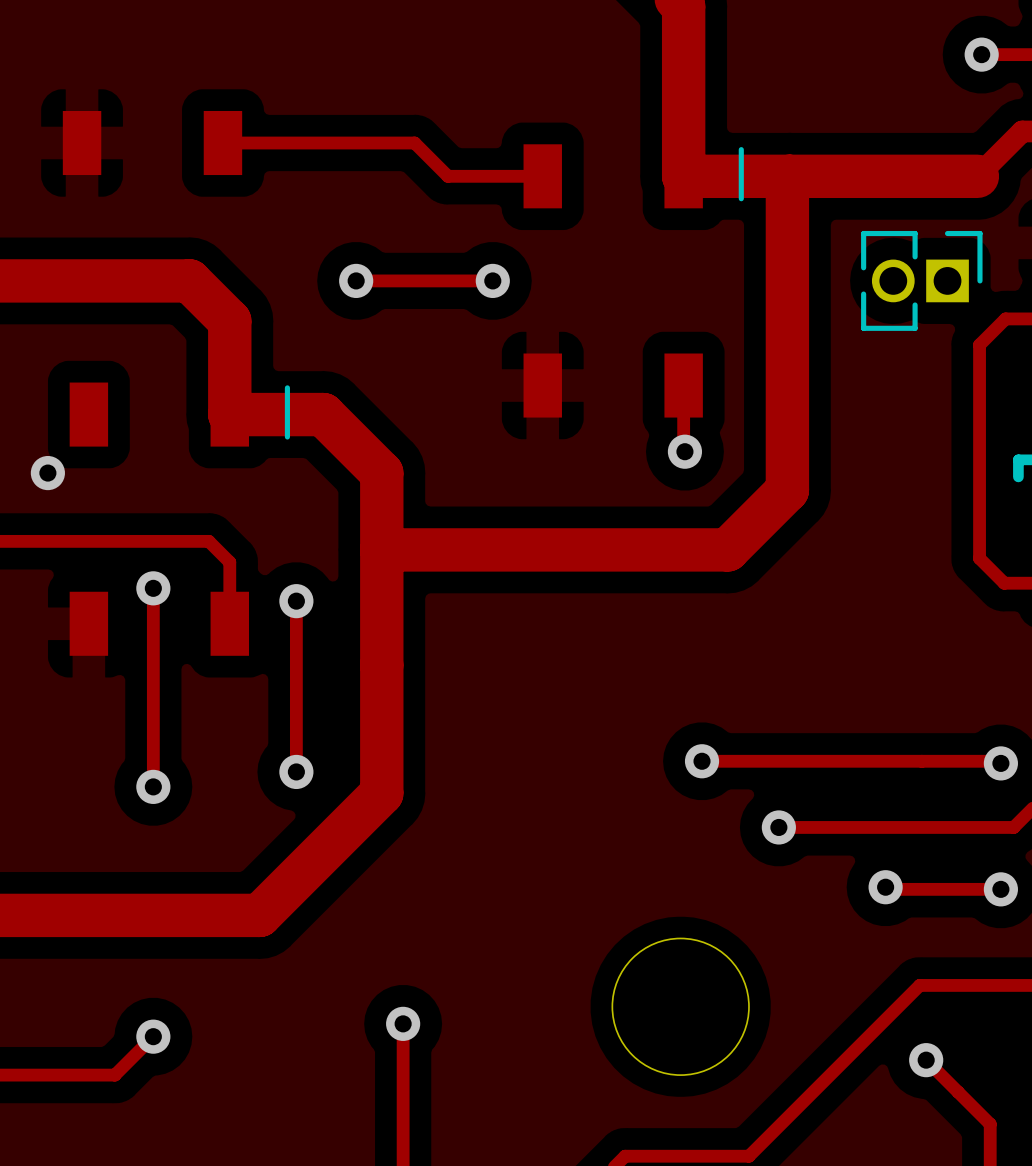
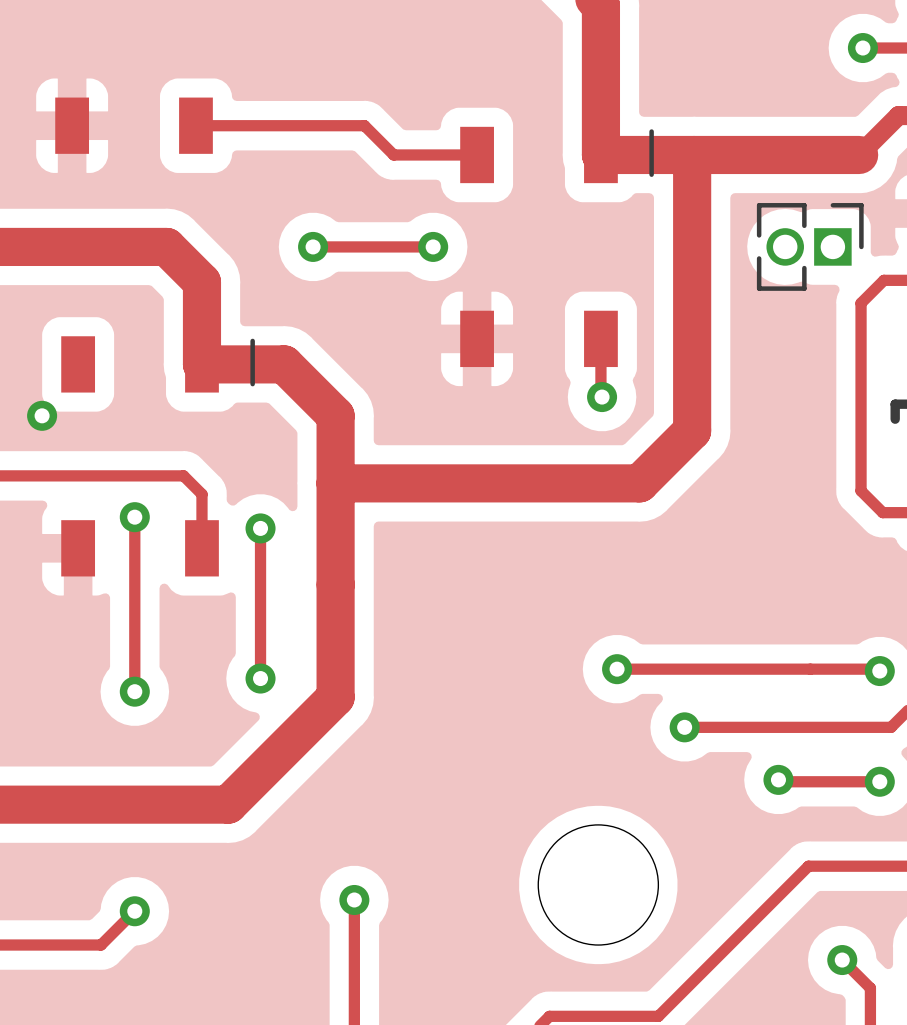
track: (926, 1060) (958, 1092) -> none
via position: (926, 1060) -> (842, 960)

